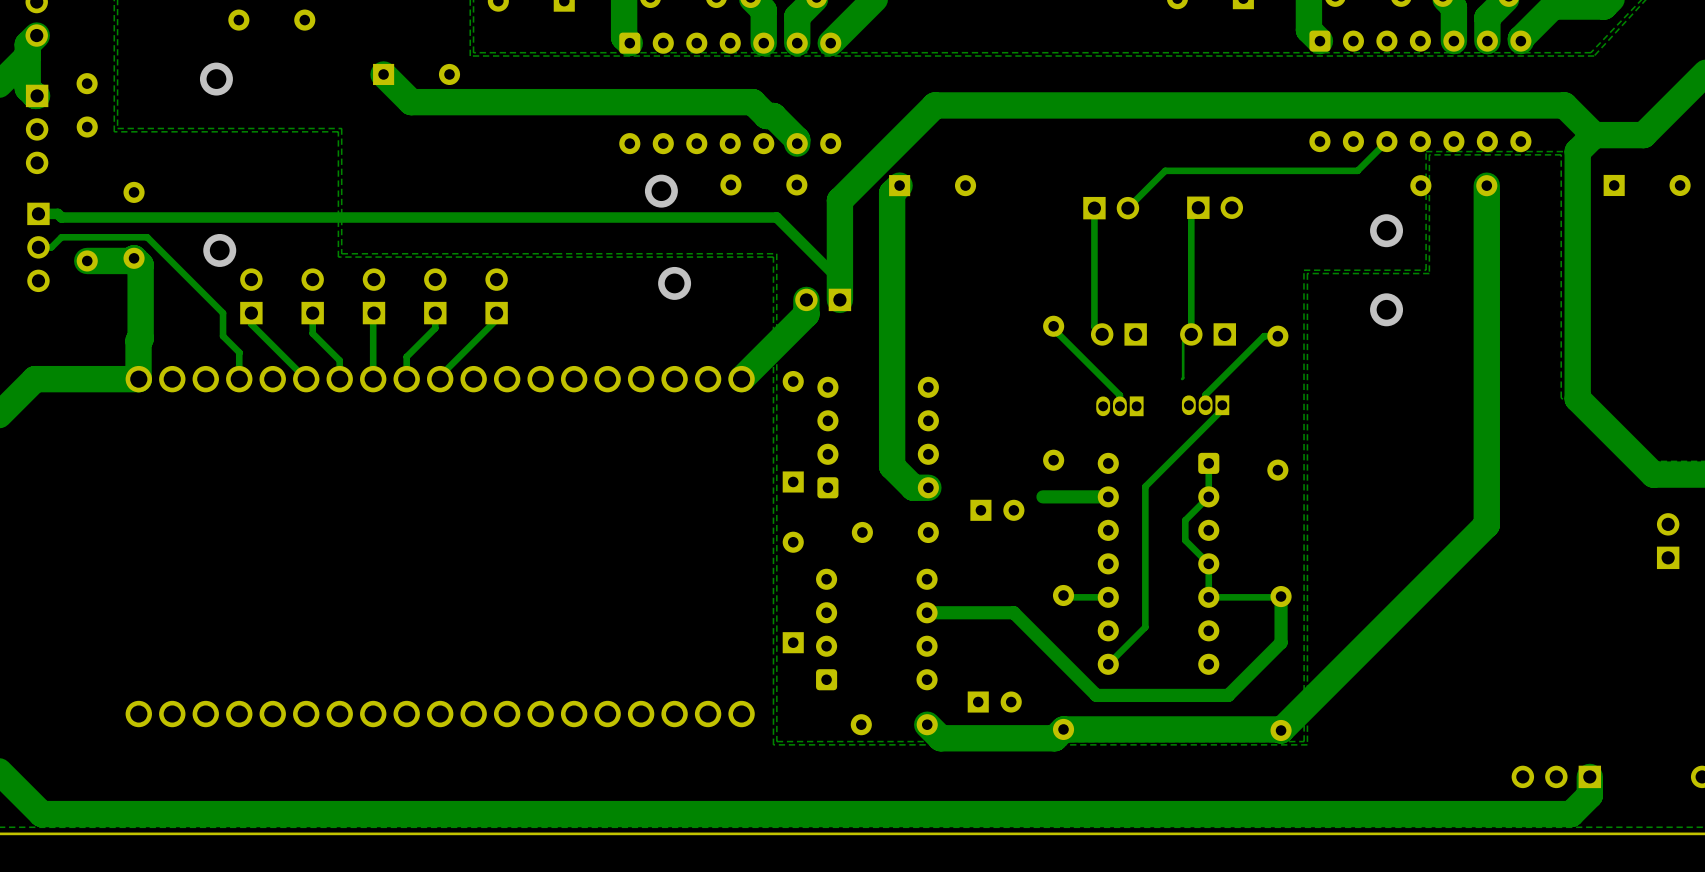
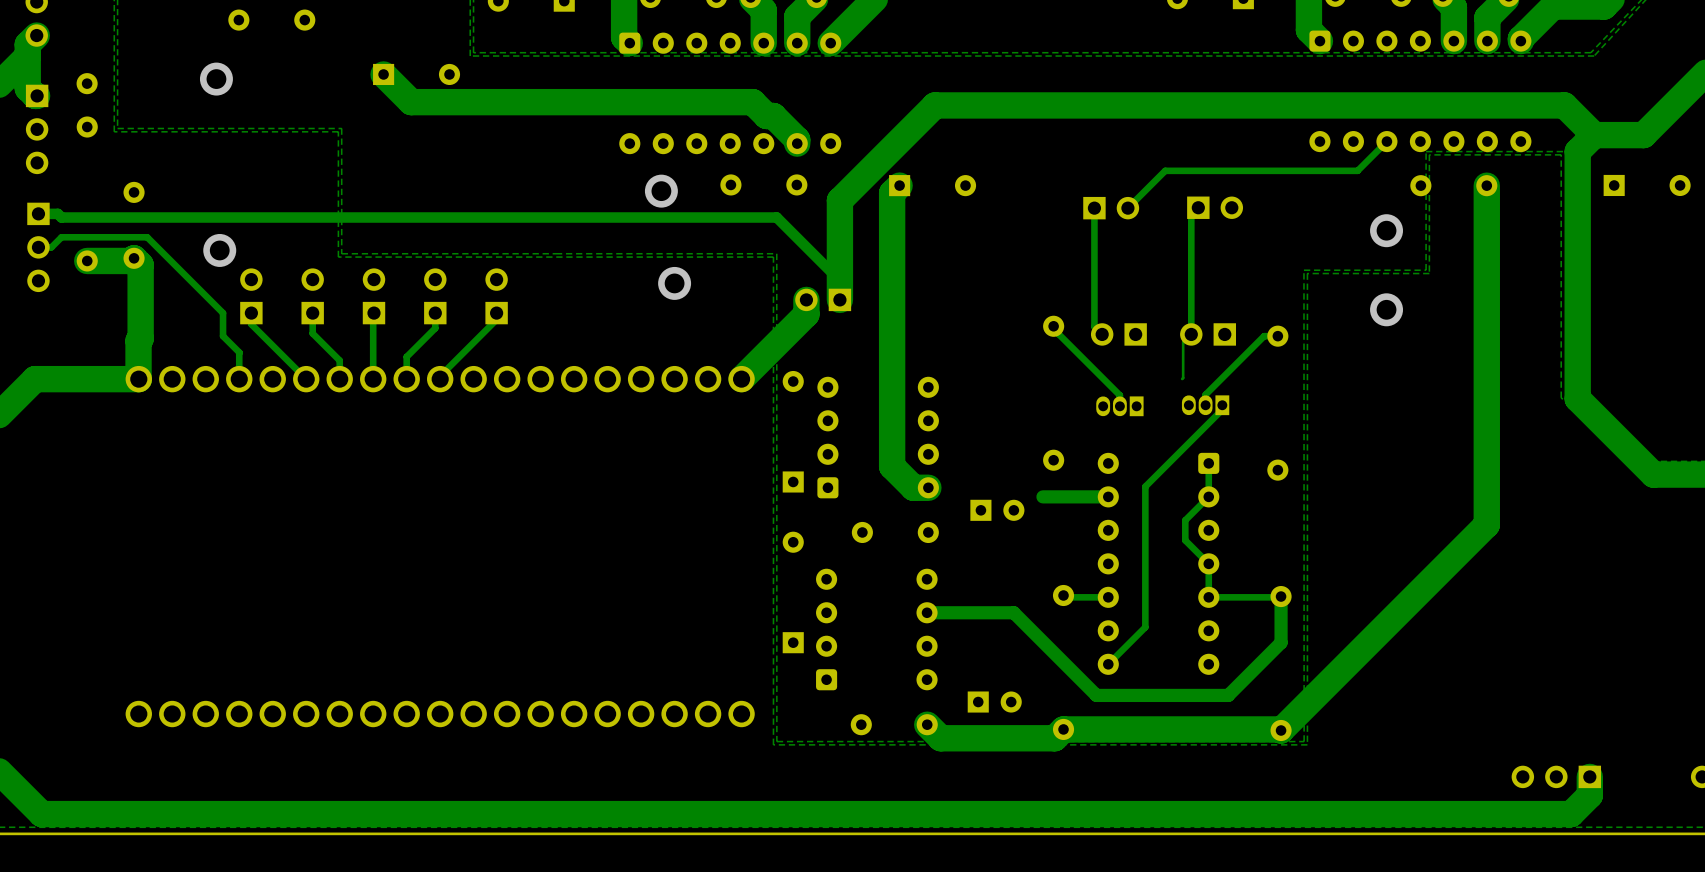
part: (1668, 541) -> none

